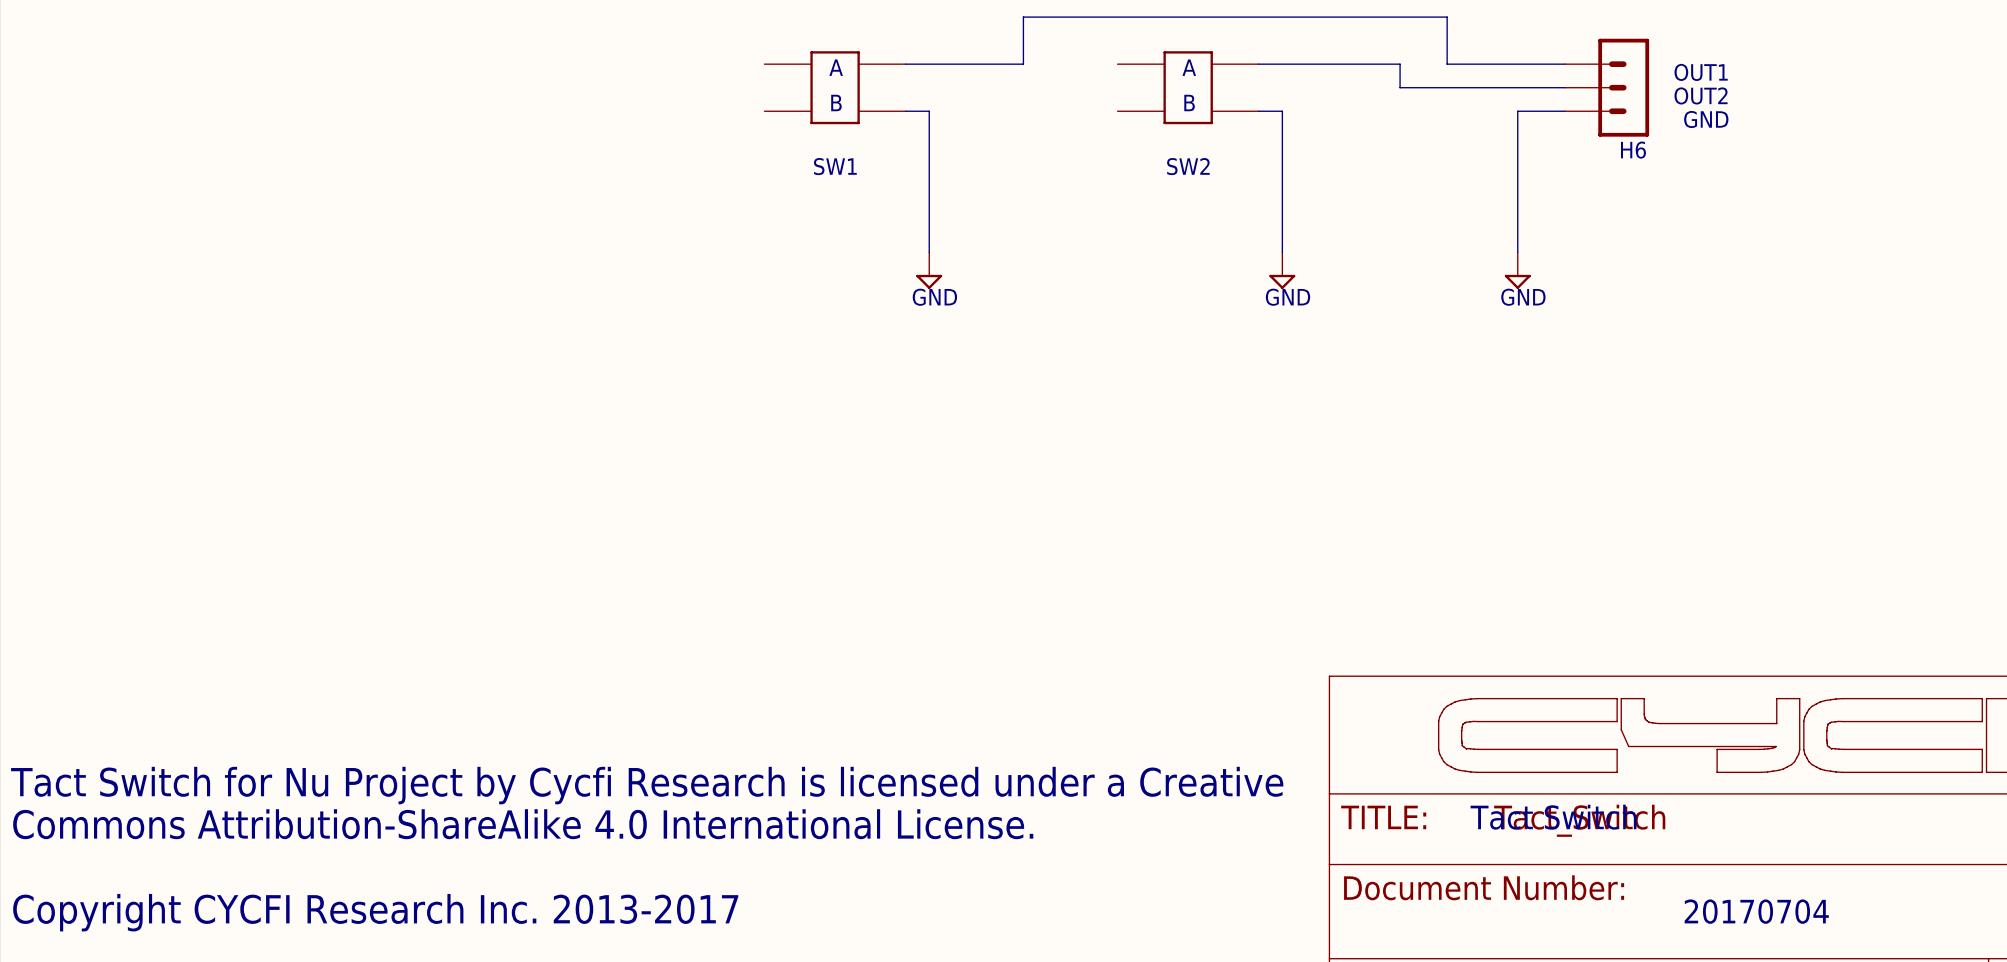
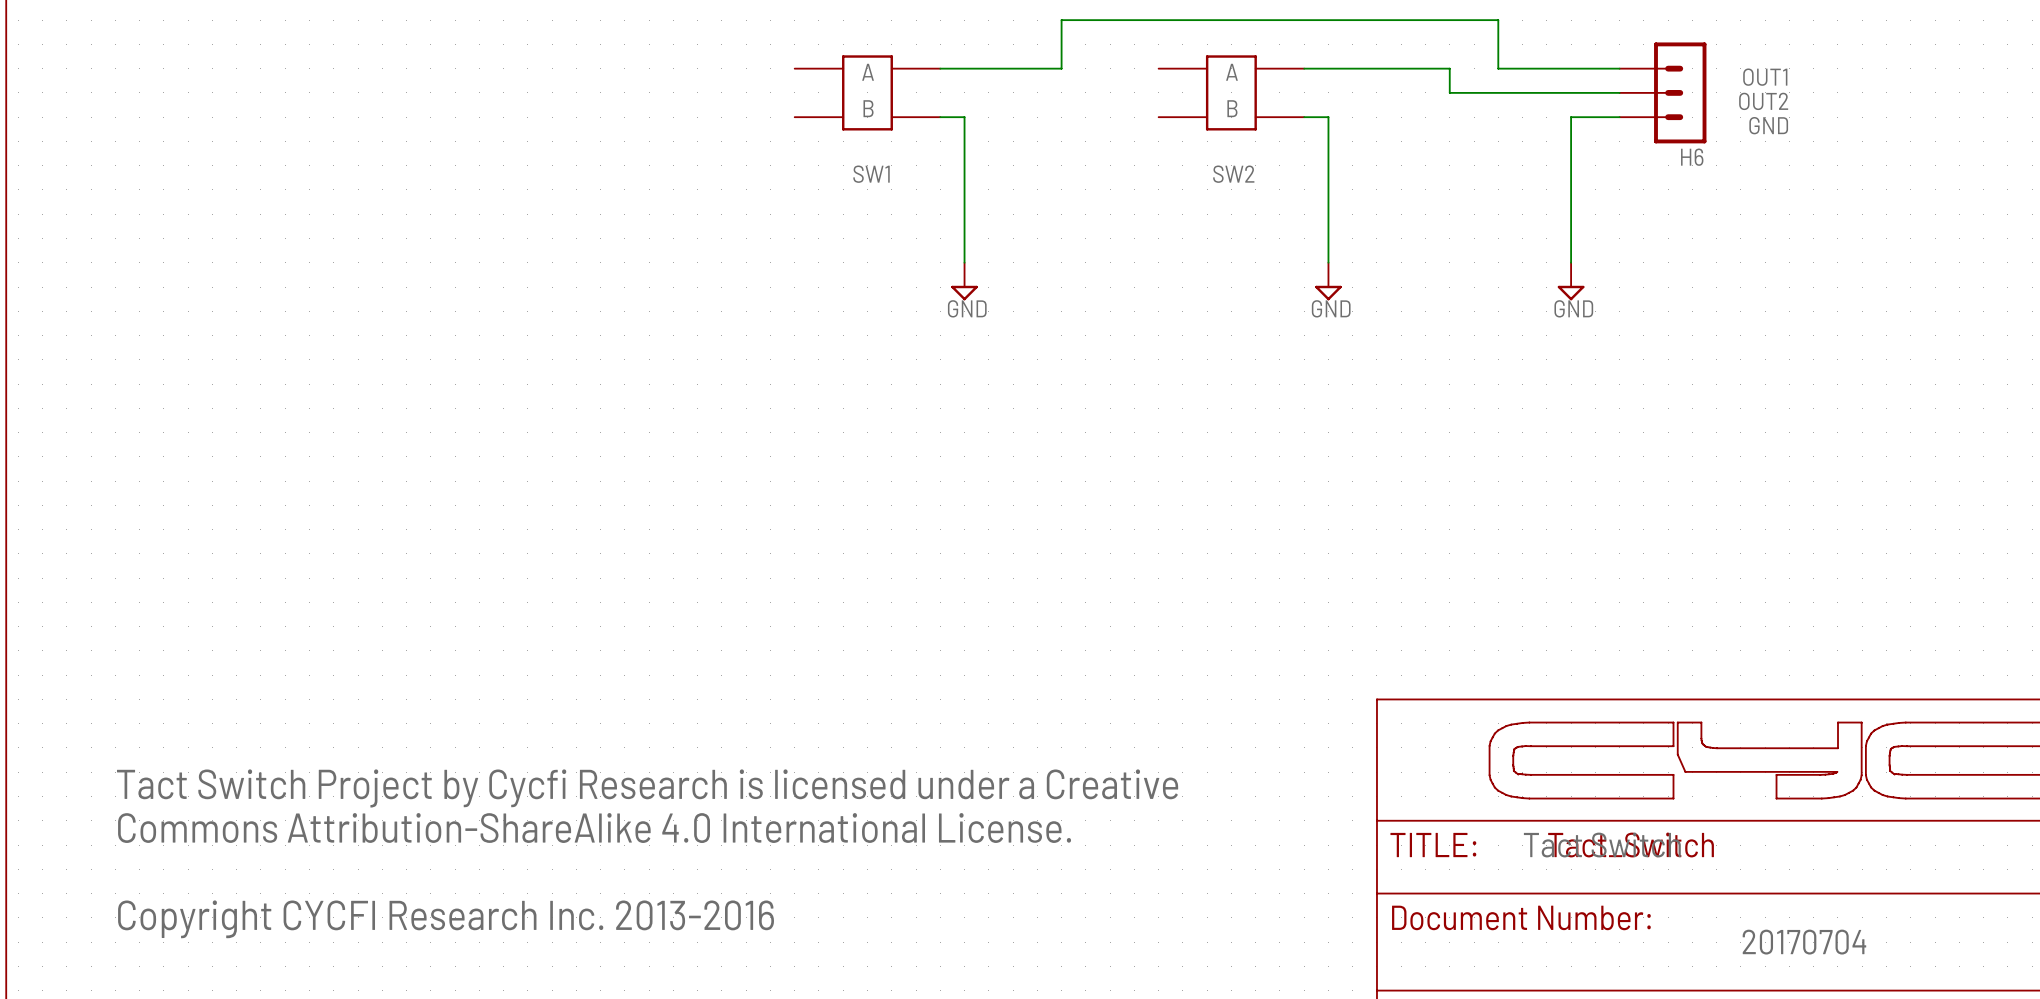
text: Tact Switch for Nu Project by Cycfi Research is licensed under a Creative (647, 785) -> Tact Switch Project by Cycfi Research is licensed under a Creative (647, 788)
text position: Commons Attribution-ShareAlike 4.0 International License. (523, 824) -> Commons Attribution-ShareAlike 4.0 International License. (594, 828)
text: Copyright CYCFI Research Inc. 2013-2017 (375, 912) -> Copyright CYCFI Research Inc. 2013-2016 (446, 919)

